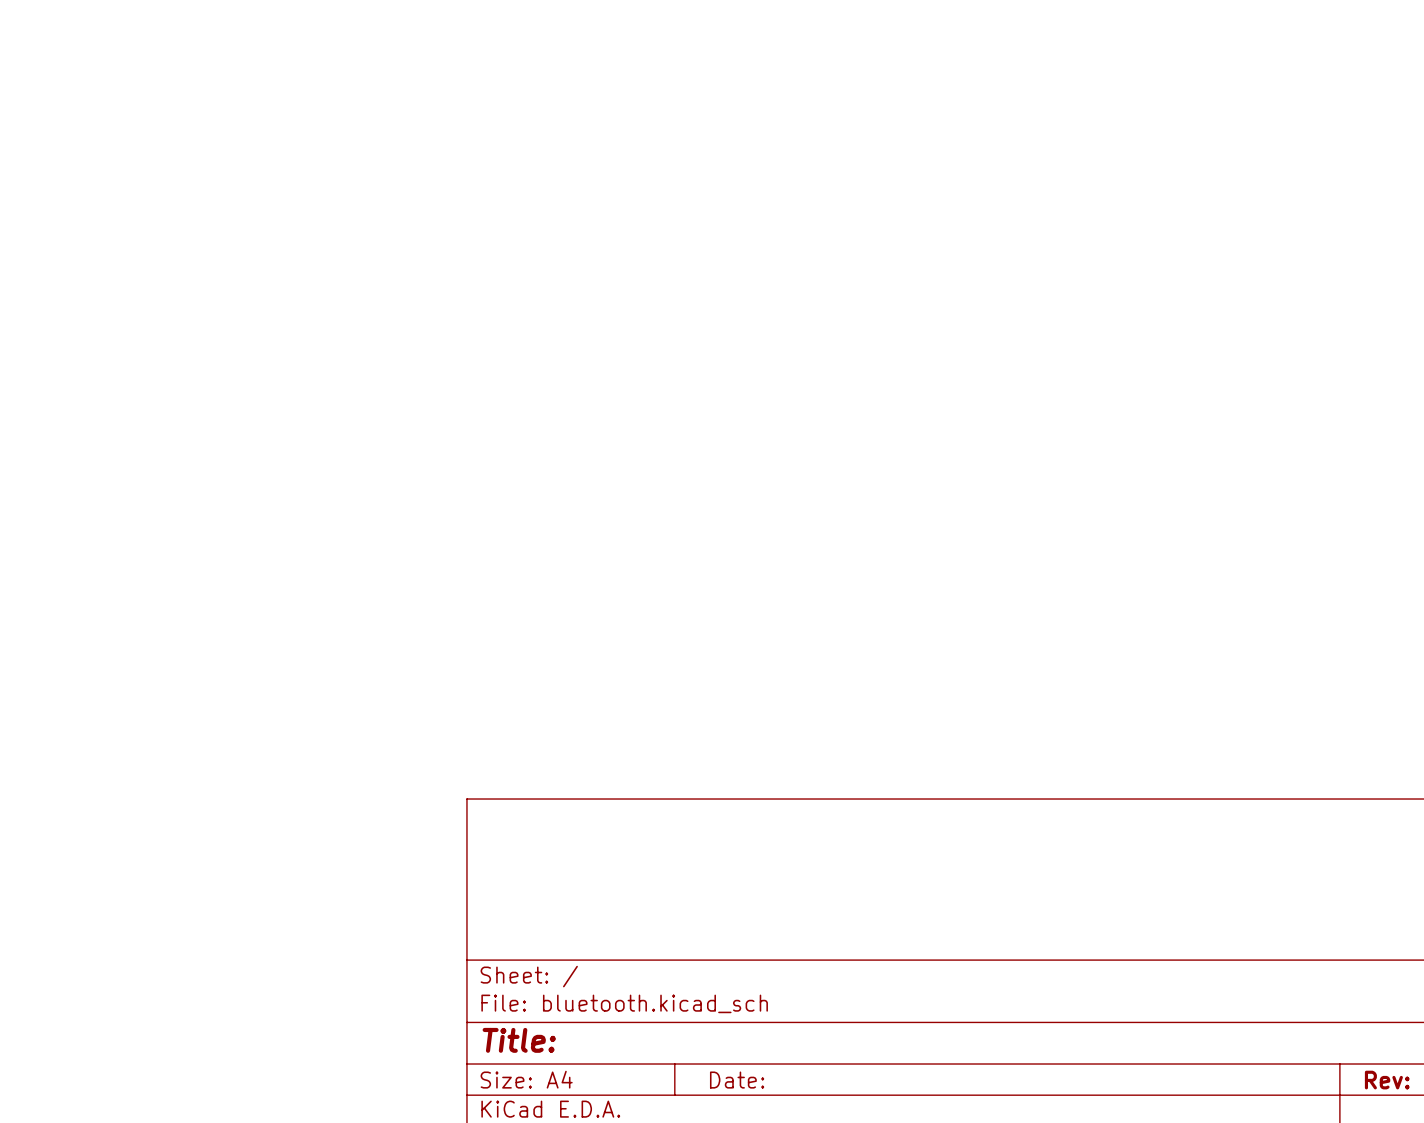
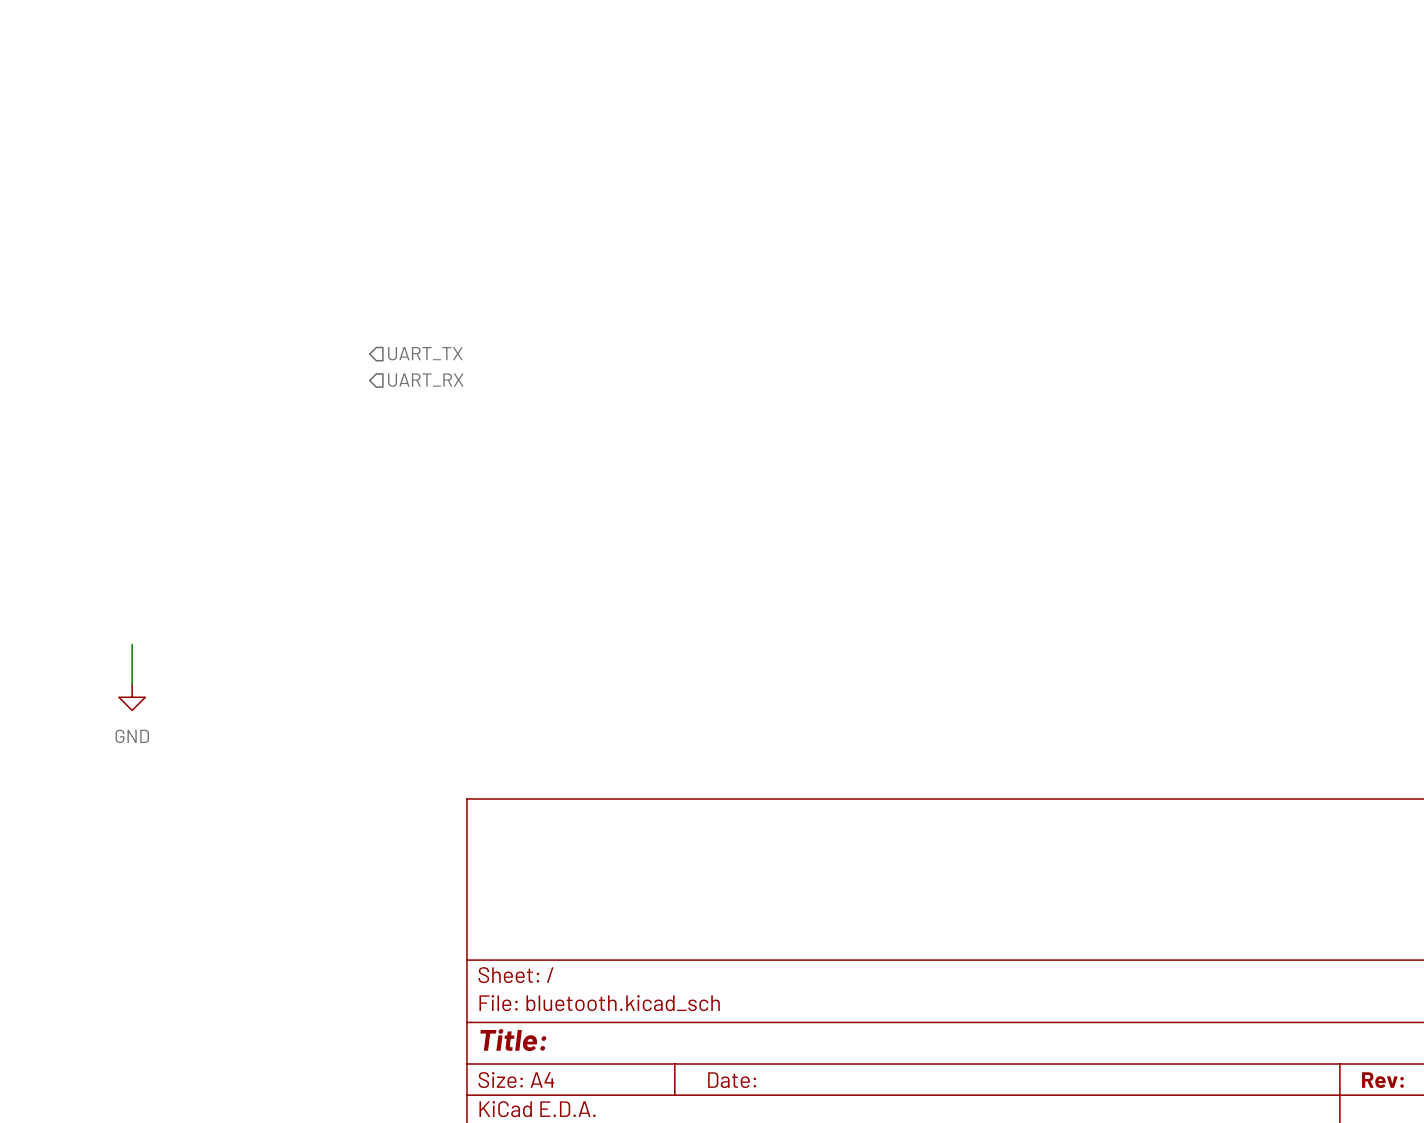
hierarchical label: none -> UART_TX (425, 353)
hierarchical label: none -> UART_RX (425, 380)
wire: none -> (132, 644) (132, 684)
power symbol: none -> GND (132, 697)

